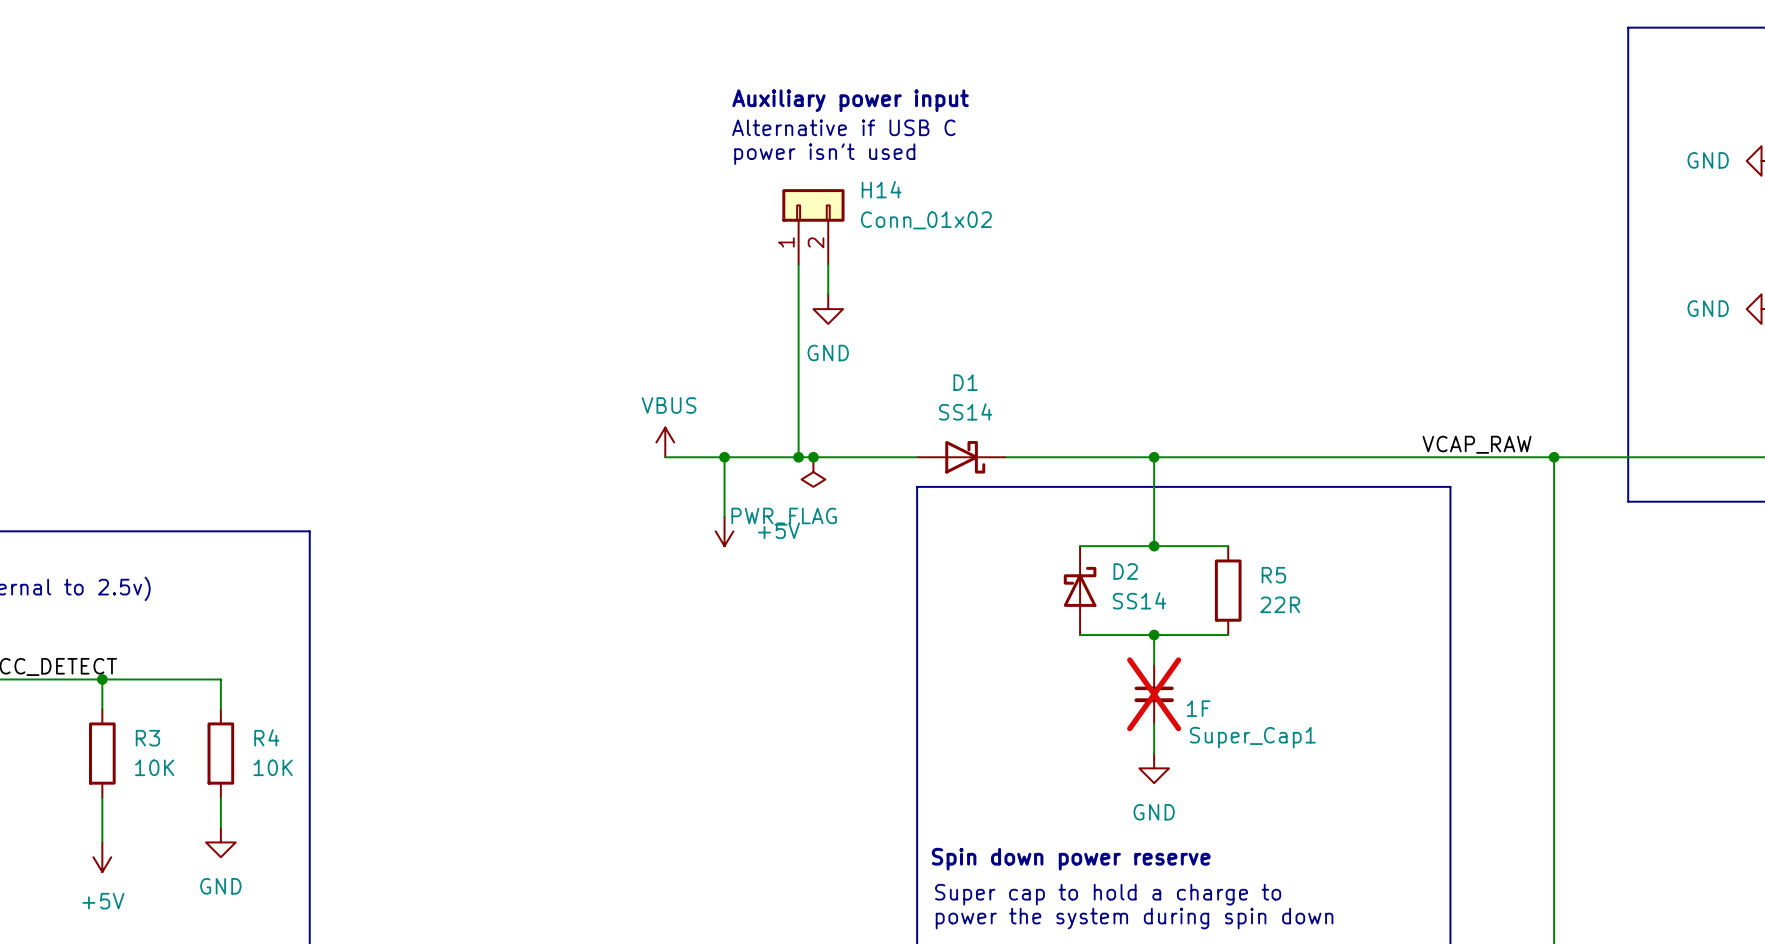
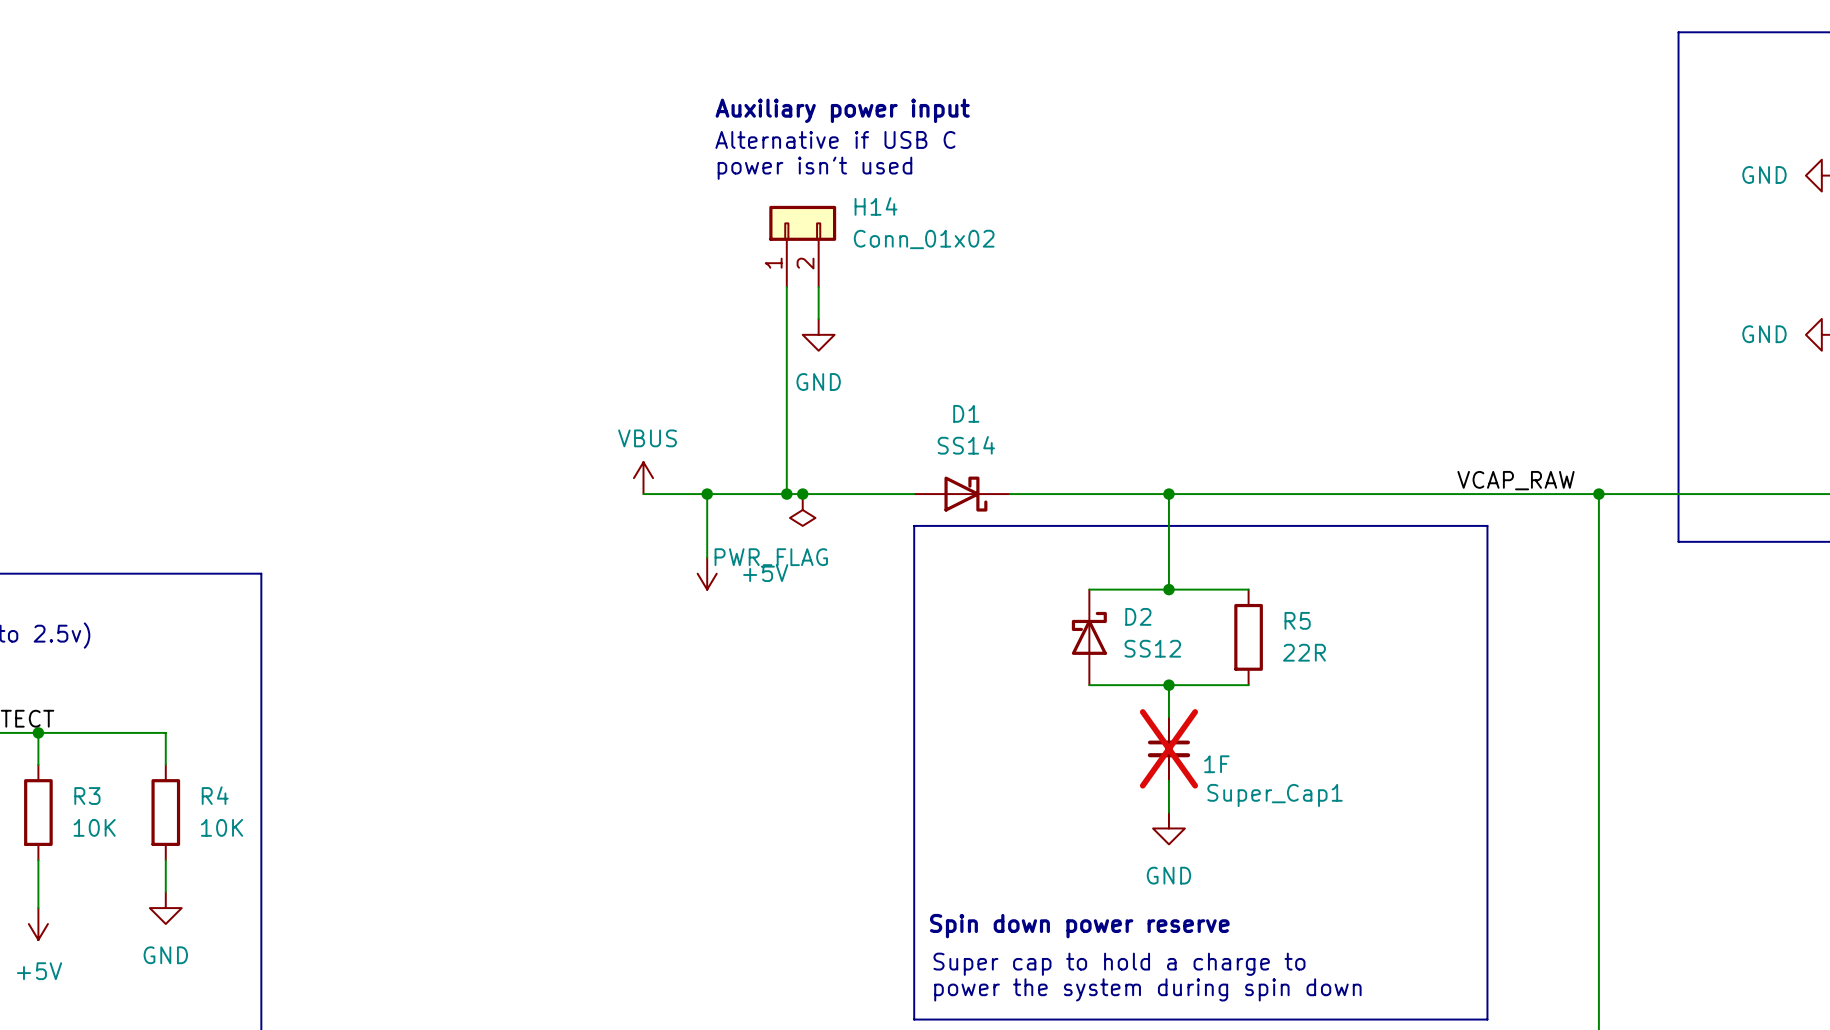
D2 value: SS14 (1139, 600) -> SS12 (1152, 648)

